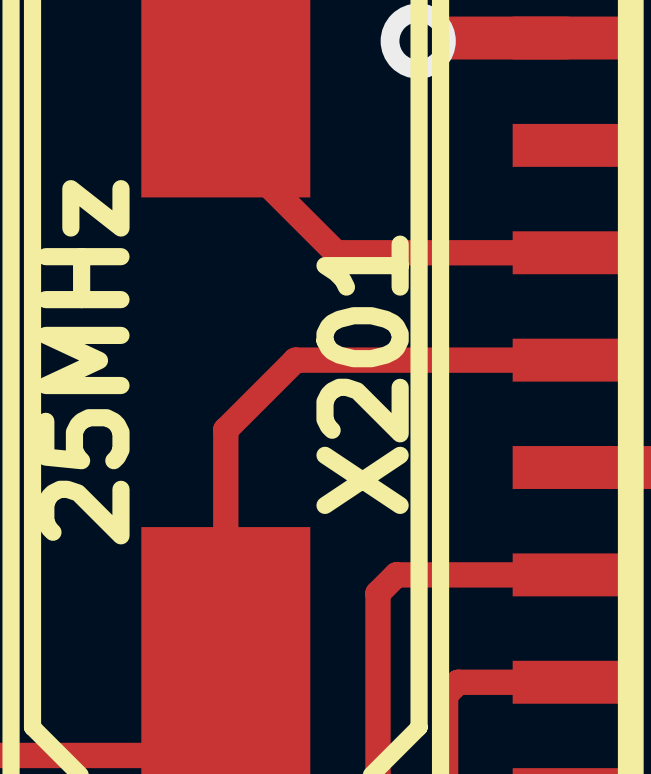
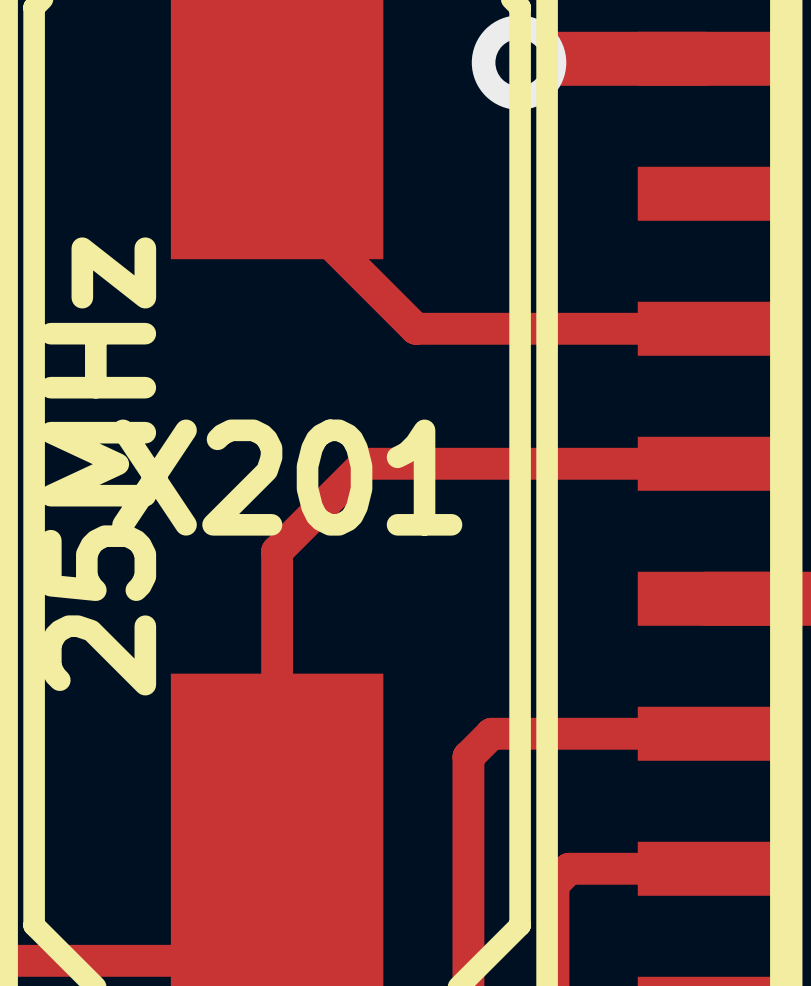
X201 name rotation: 0° (362, 374) -> 90° clockwise (287, 477)

